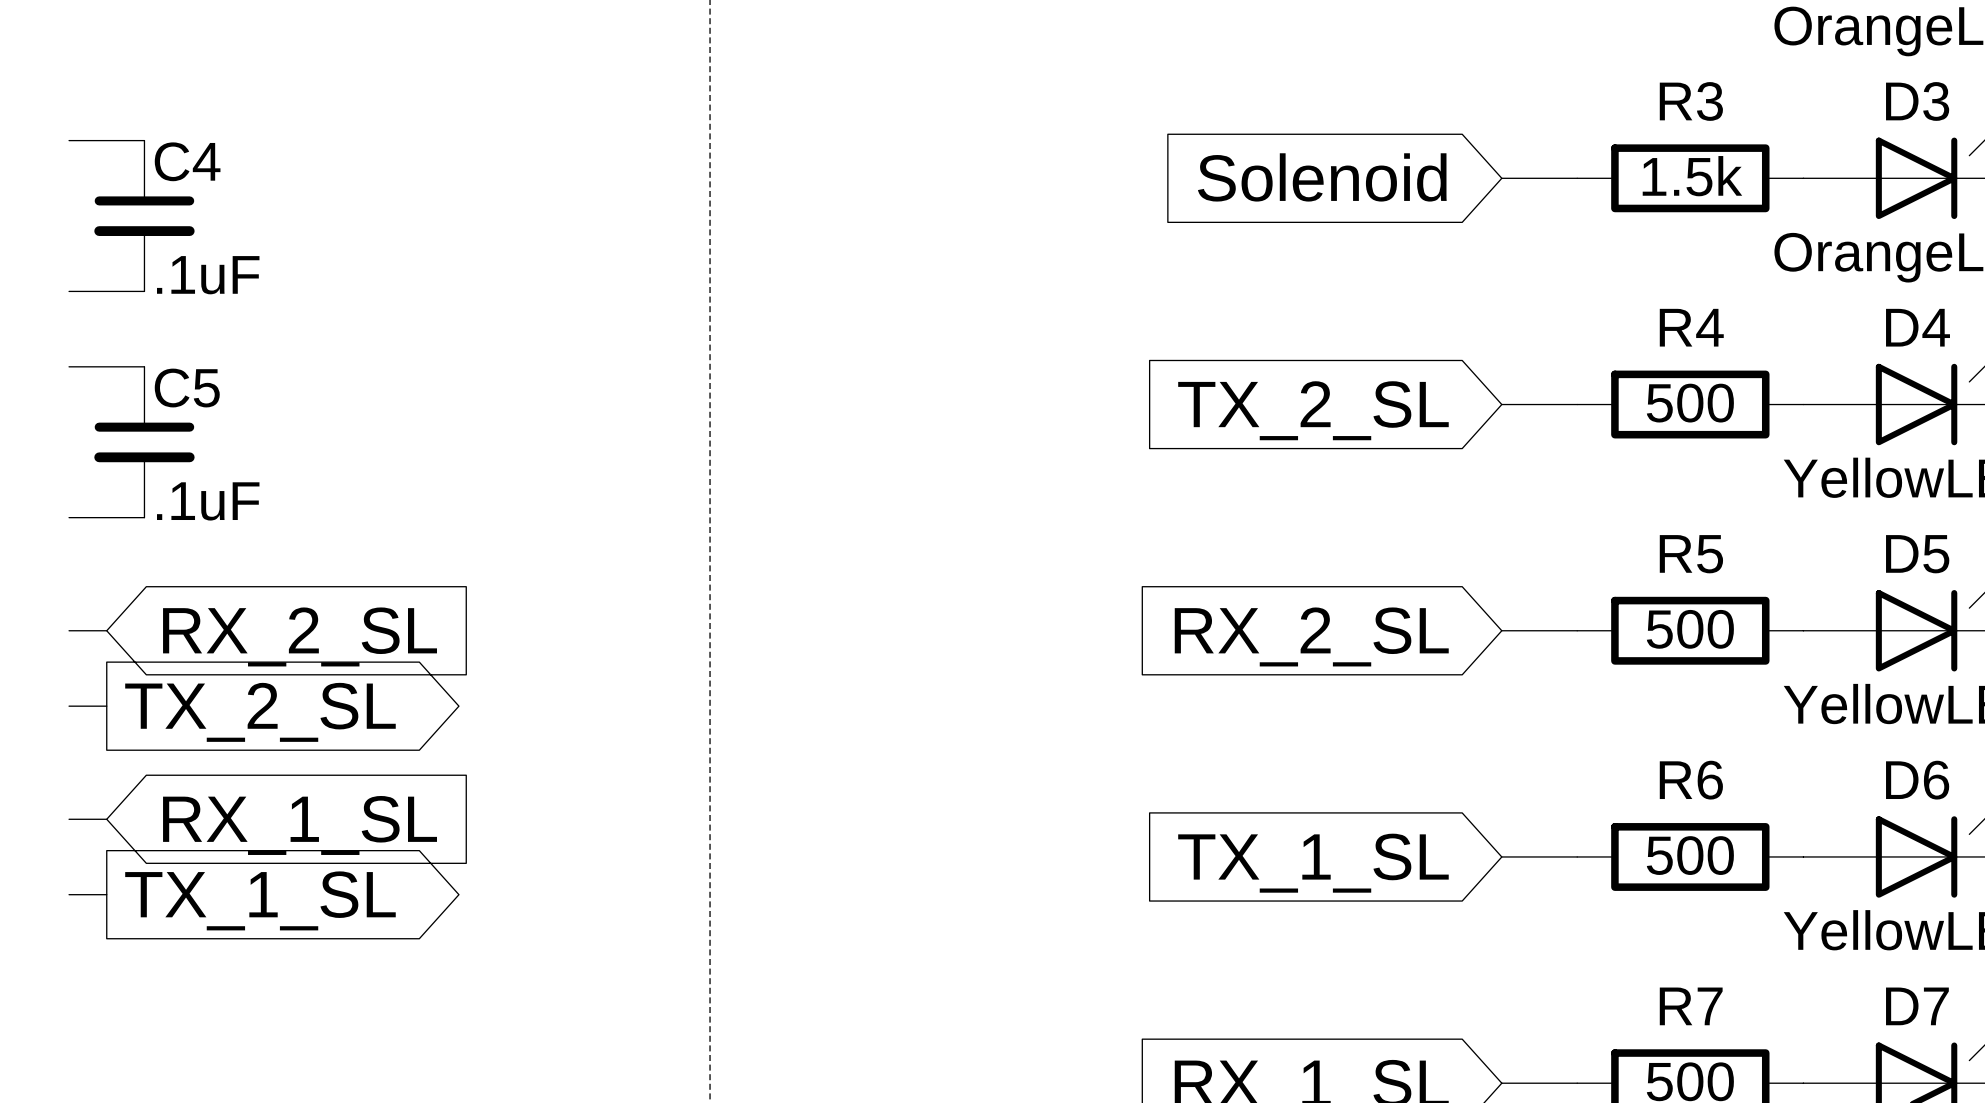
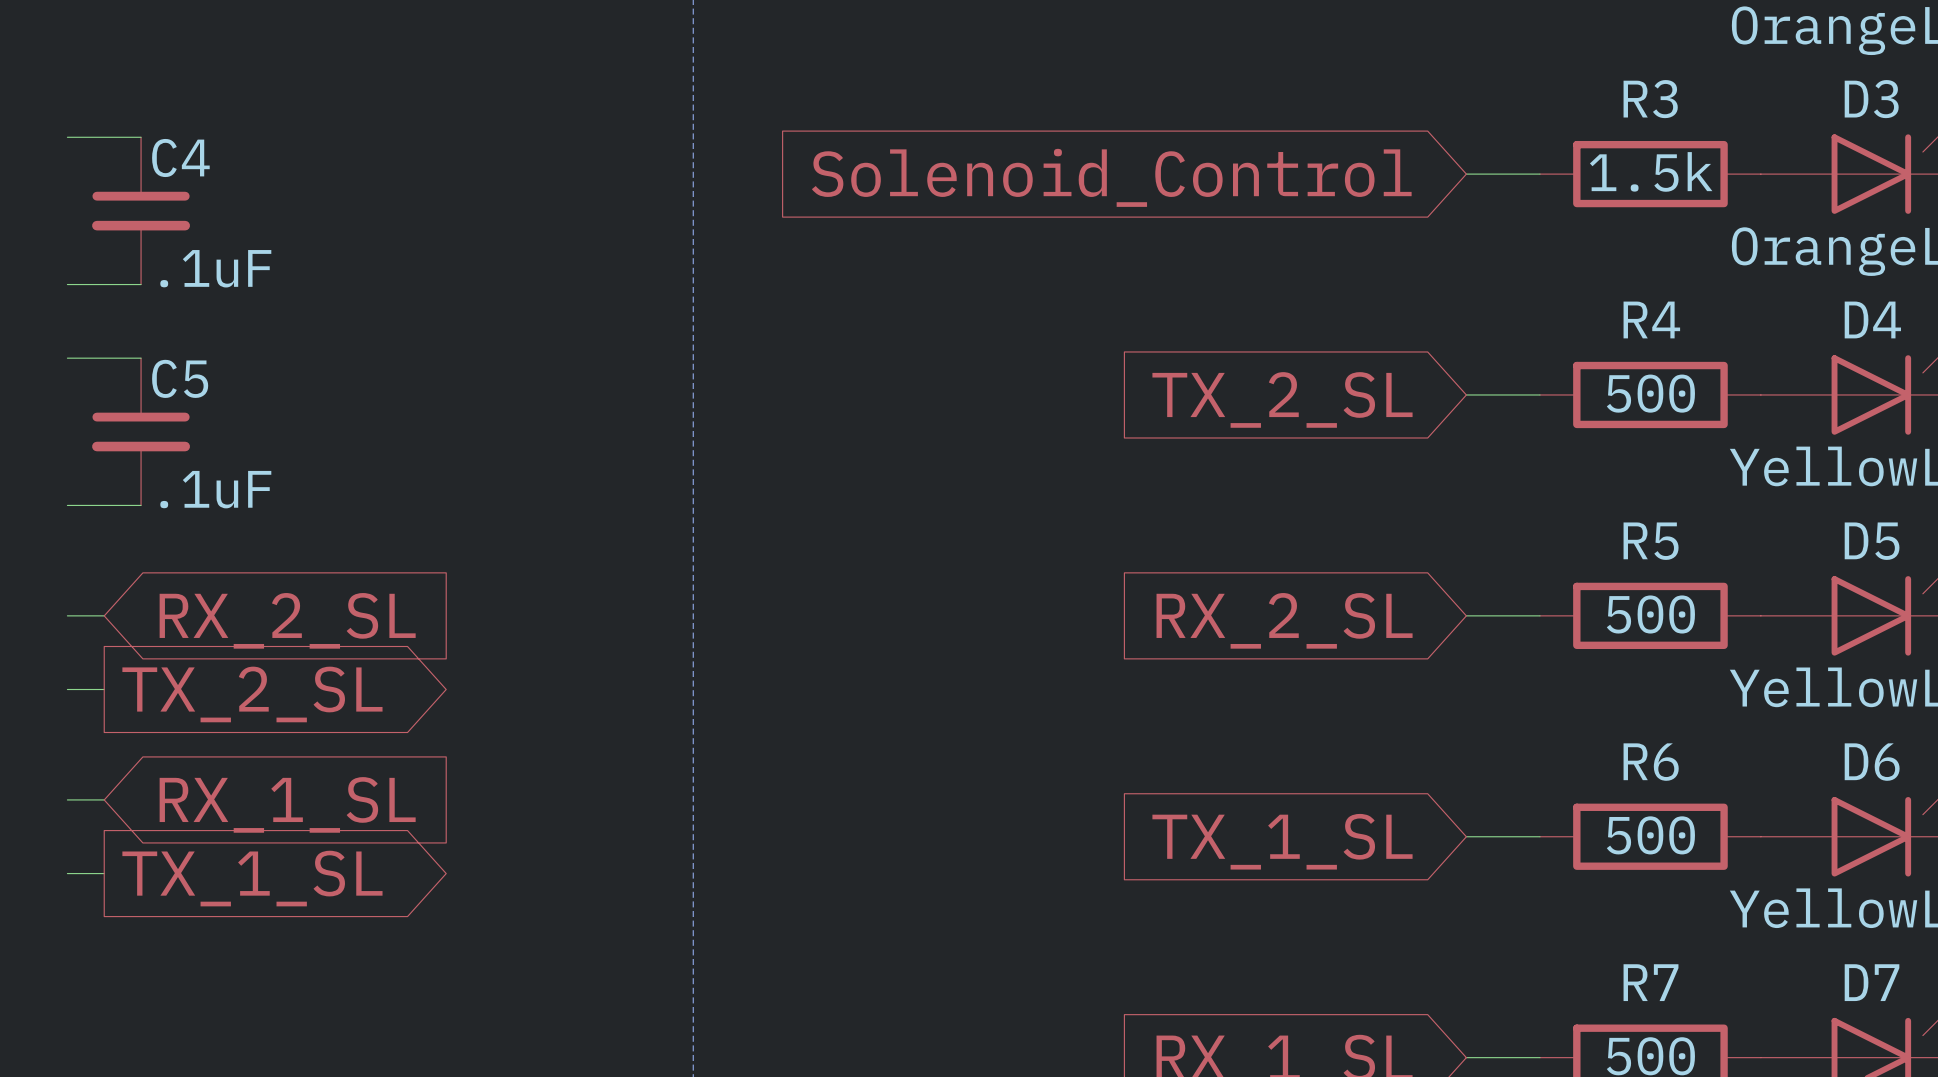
global label: Solenoid (1322, 177) -> Solenoid_Control (1111, 177)

